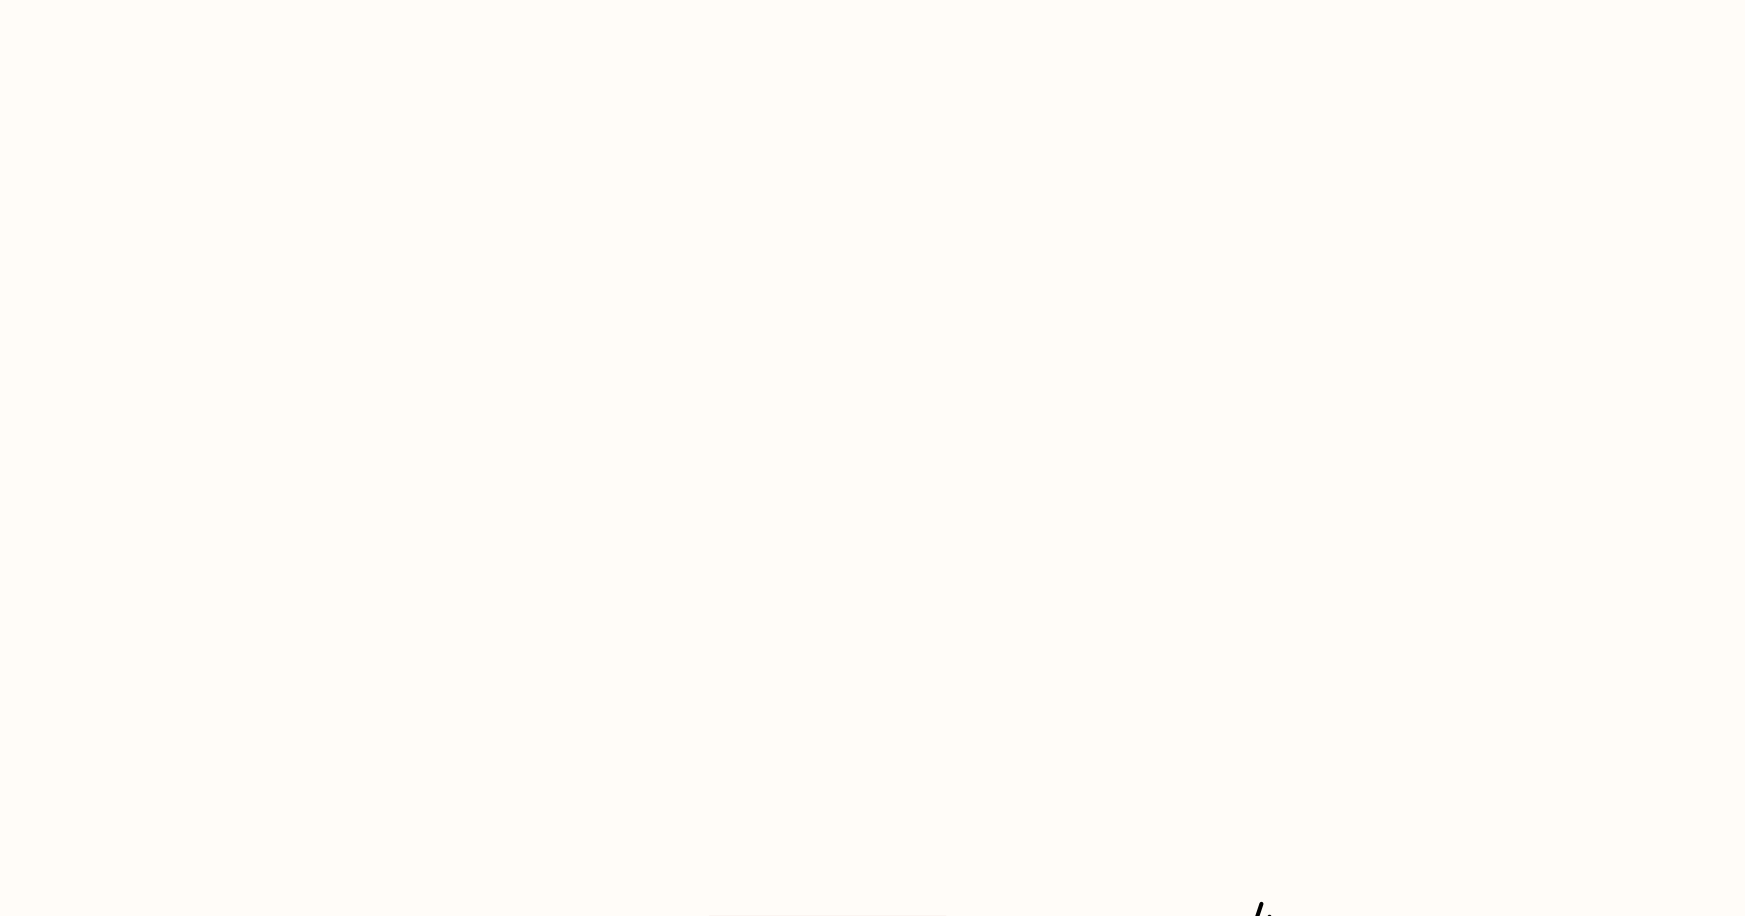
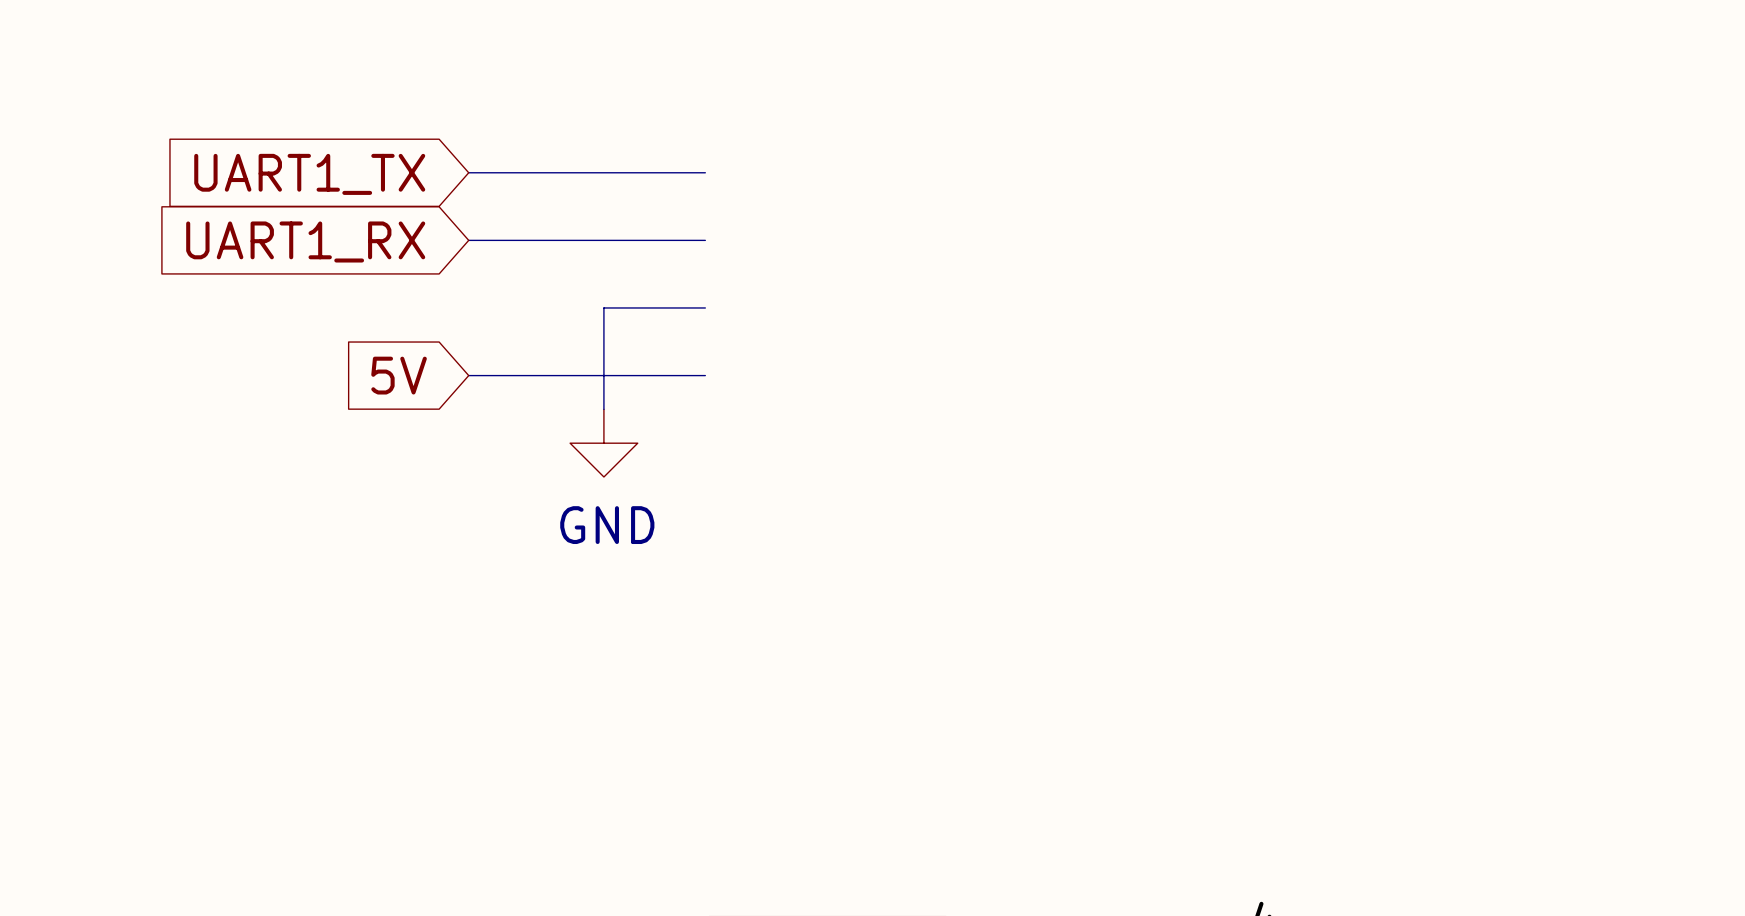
wire: none -> (468, 172) (705, 172)
global label: none -> UART1_TX (309, 174)
wire: none -> (468, 240) (705, 240)
global label: none -> UART1_RX (305, 241)
wire: none -> (705, 307) (603, 307) (603, 409)
global label: none -> 5V (399, 375)
wire: none -> (468, 375) (705, 375)
power symbol: none -> GND (603, 443)

